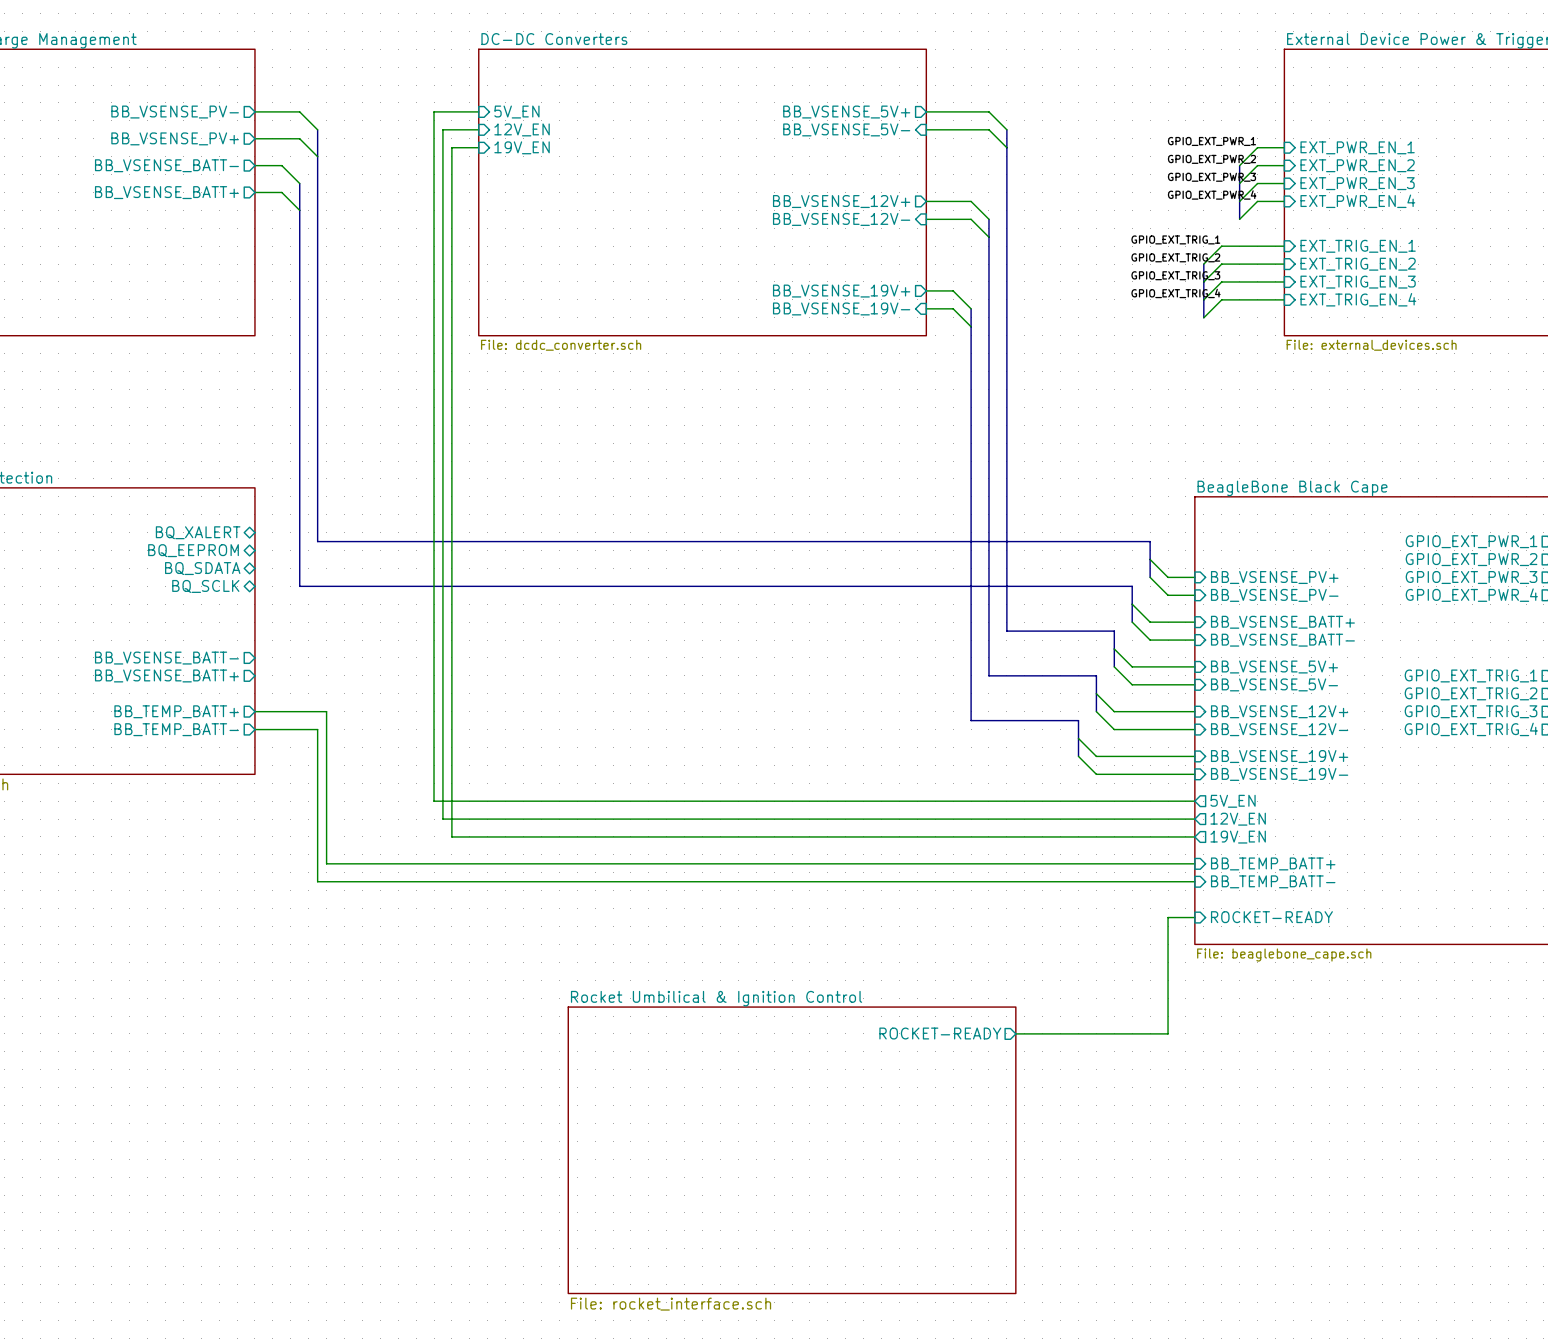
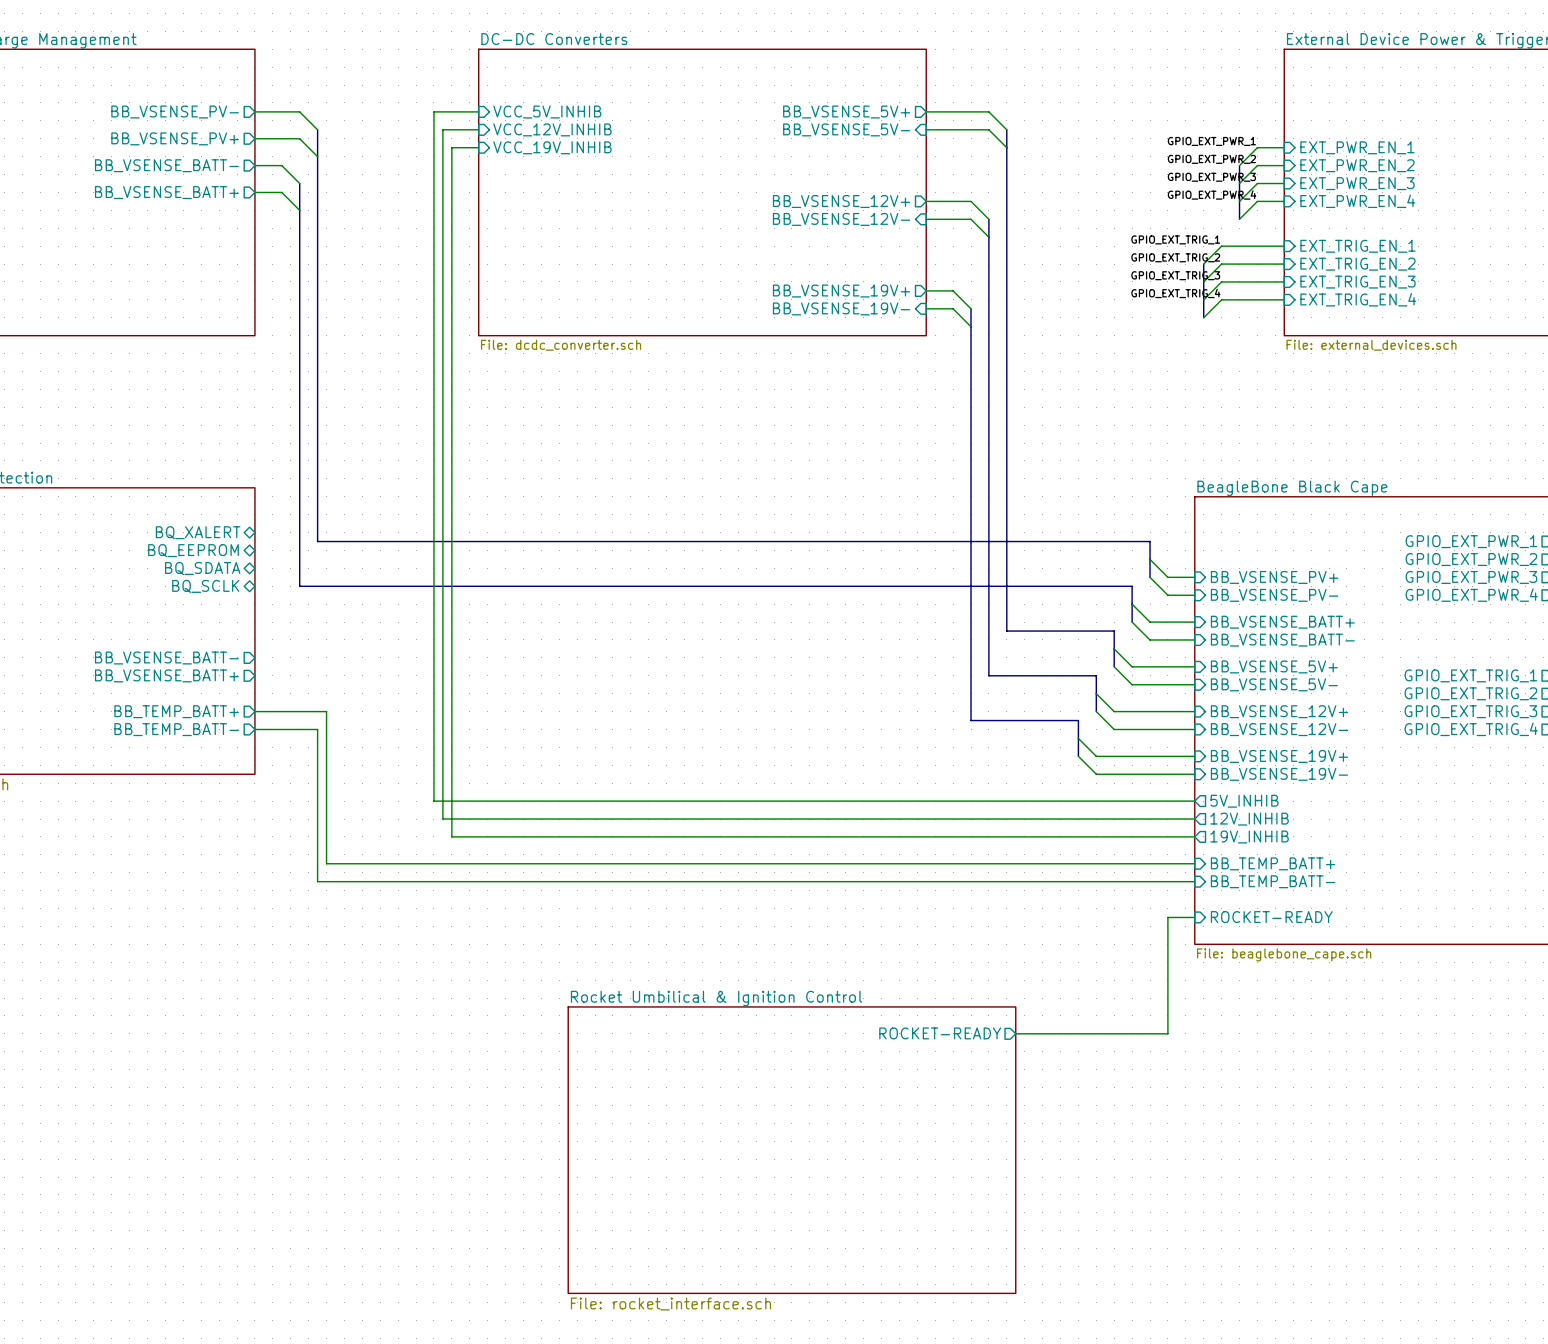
sheet pin: 5V_EN (516, 112) -> VCC_5V_INHIB (547, 112)
sheet pin: 12V_EN (522, 129) -> VCC_12V_INHIB (552, 129)
sheet pin: 19V_EN (522, 147) -> VCC_19V_INHIB (552, 147)
sheet pin: 5V_EN (1233, 801) -> 5V_INHIB (1244, 801)
sheet pin: 12V_EN (1238, 819) -> 12V_INHIB (1249, 819)
sheet pin: 19V_EN (1238, 837) -> 19V_INHIB (1249, 837)

